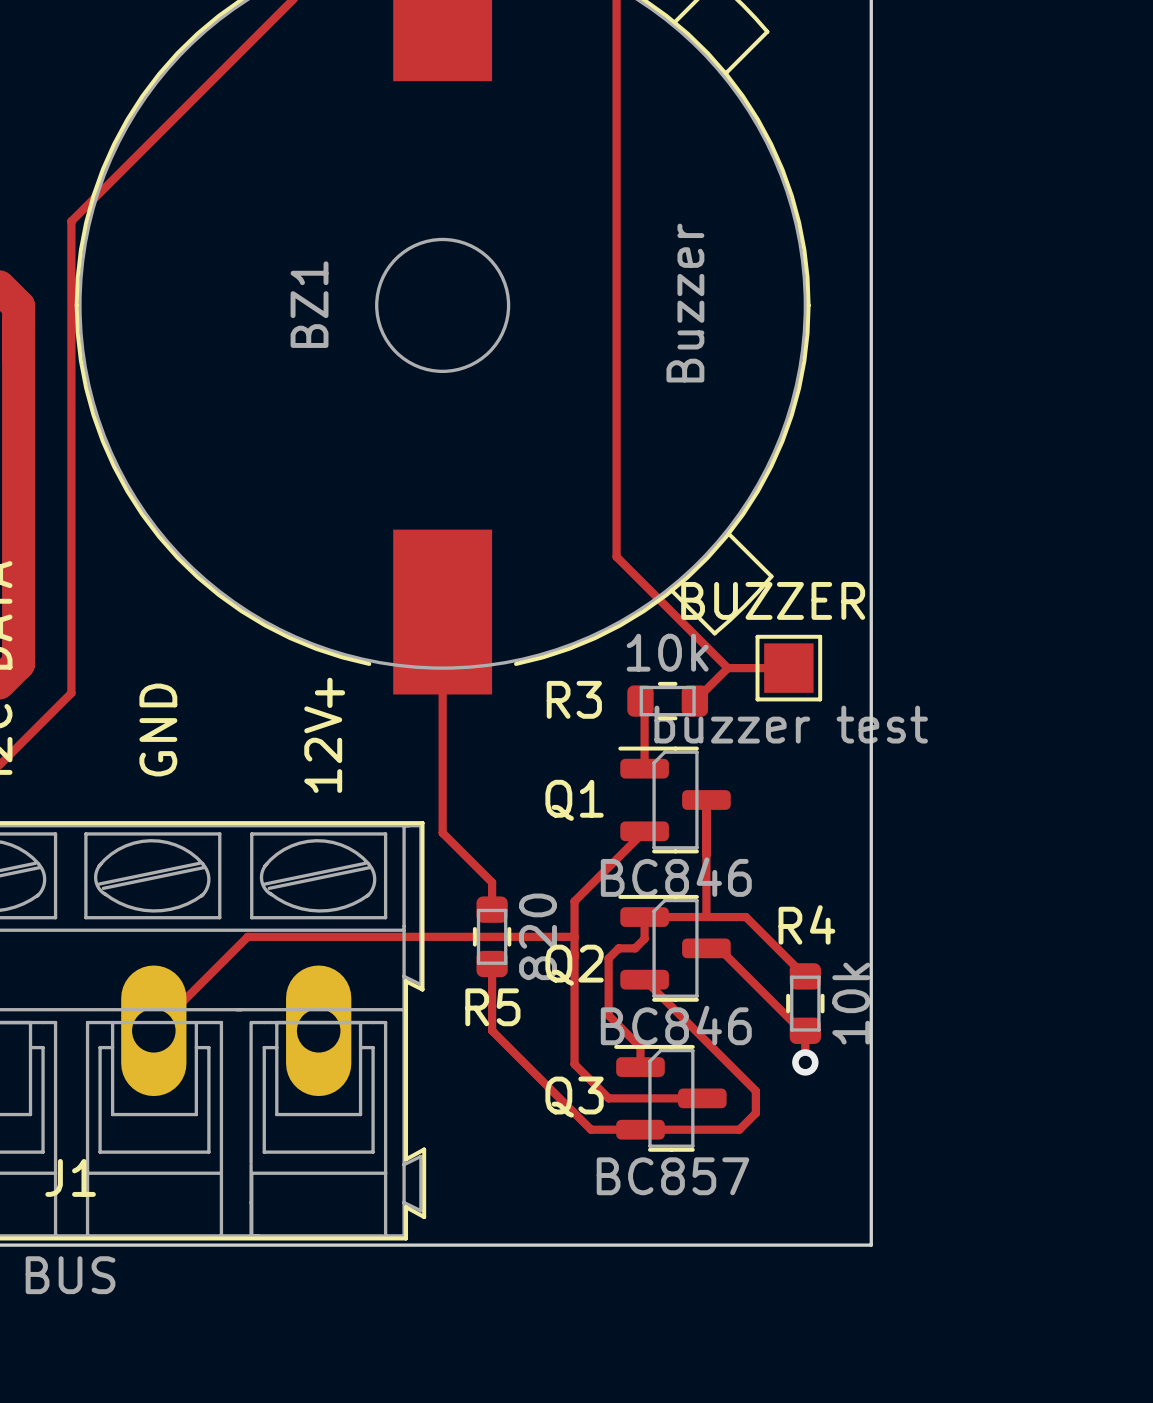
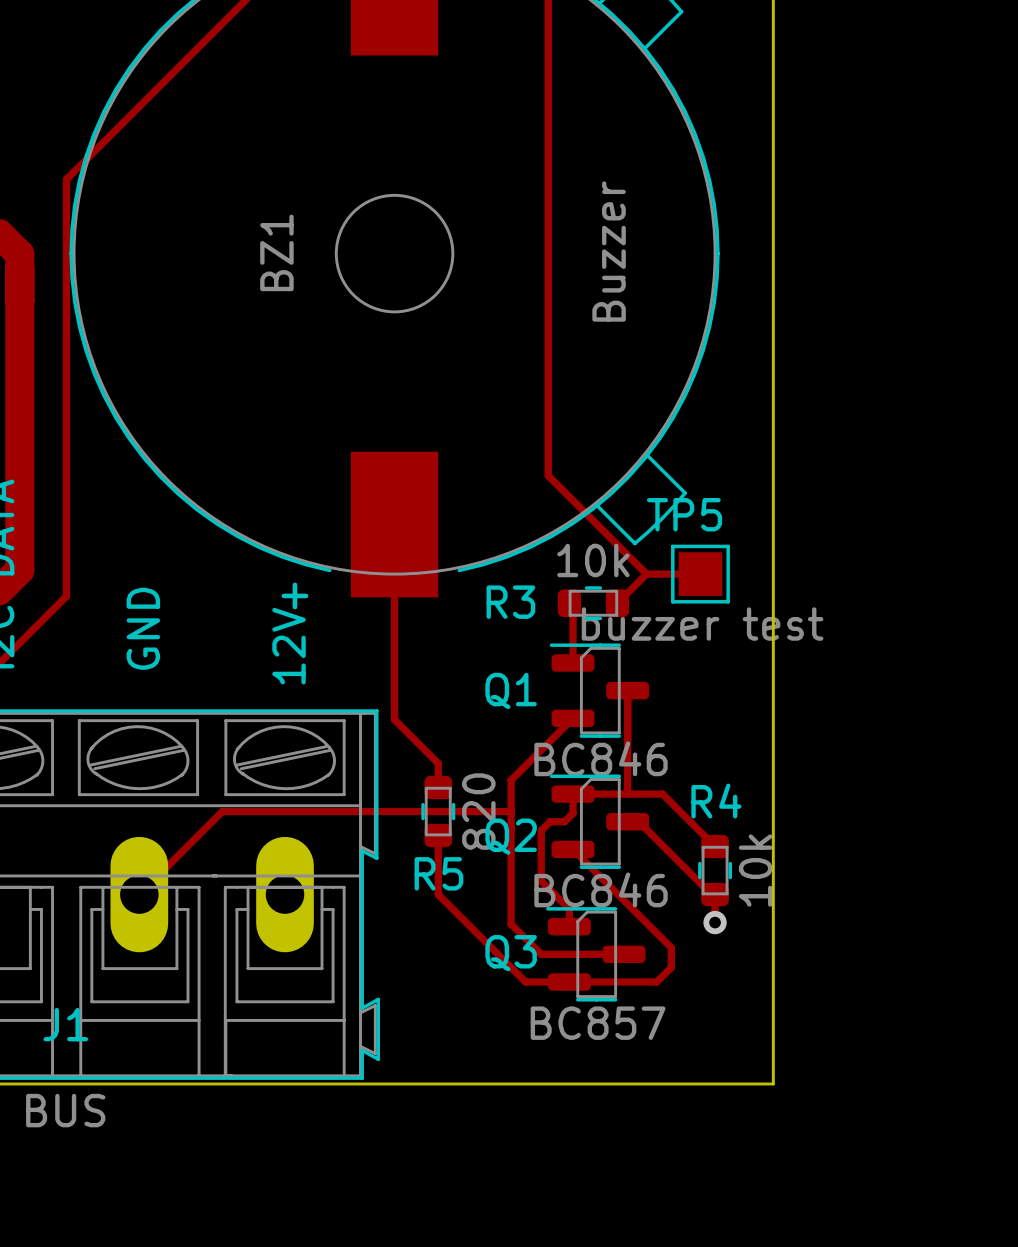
BUZZER name: BUZZER (773, 600) -> TP5 (684, 514)

